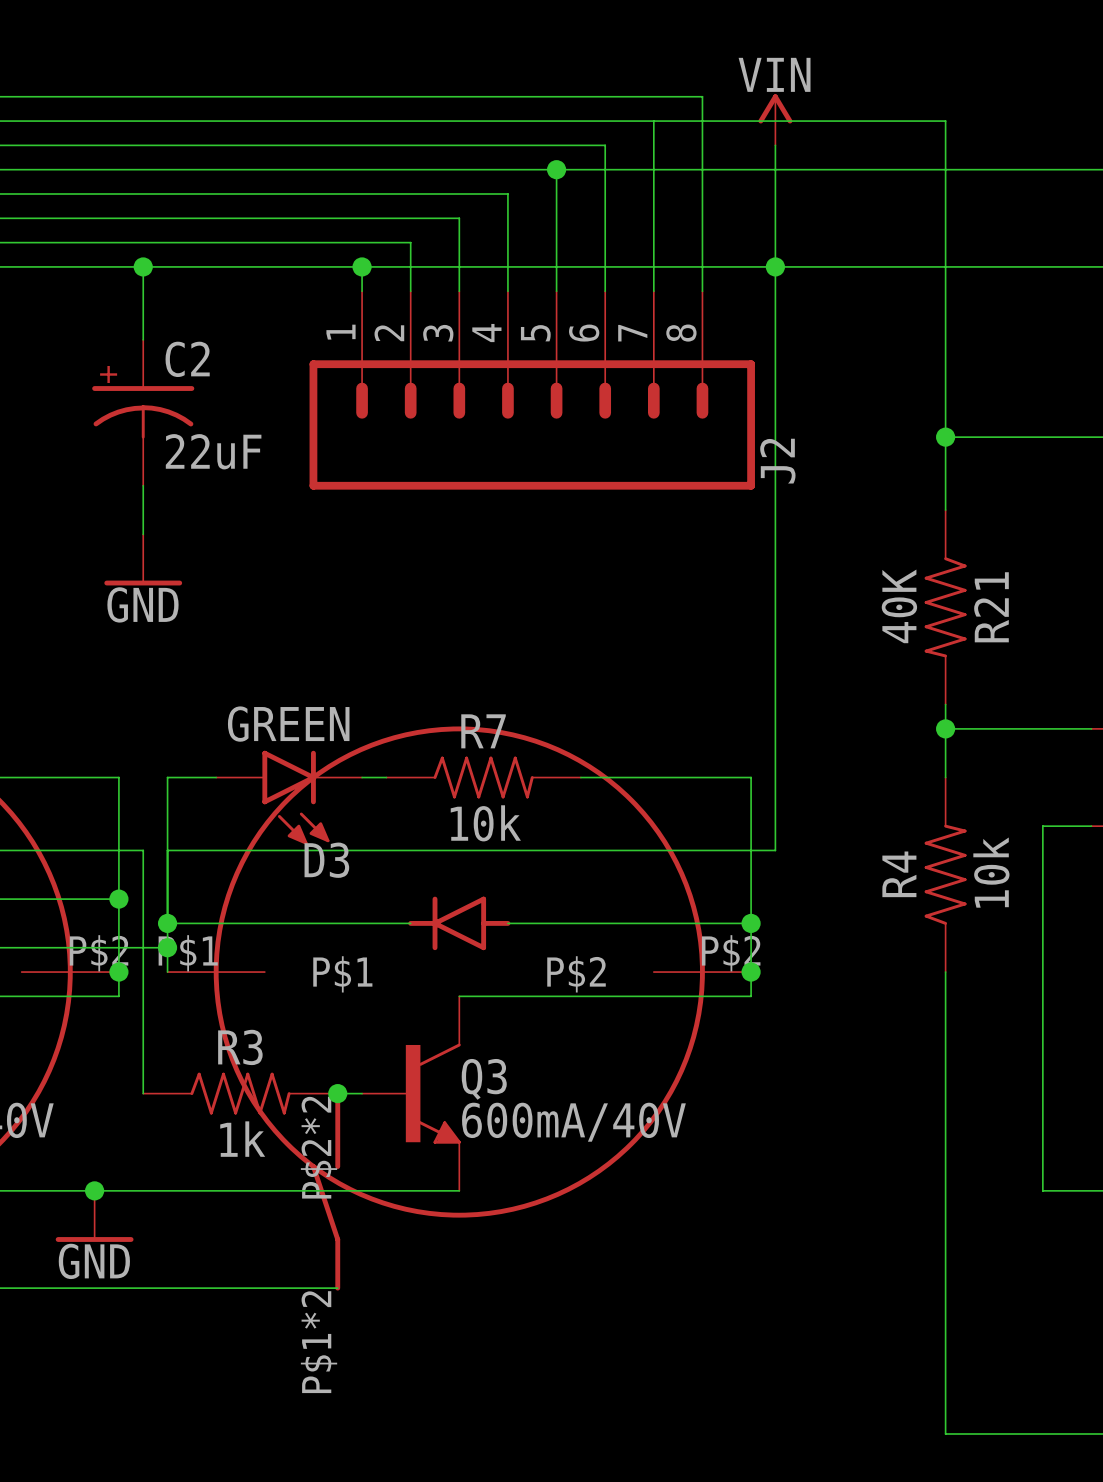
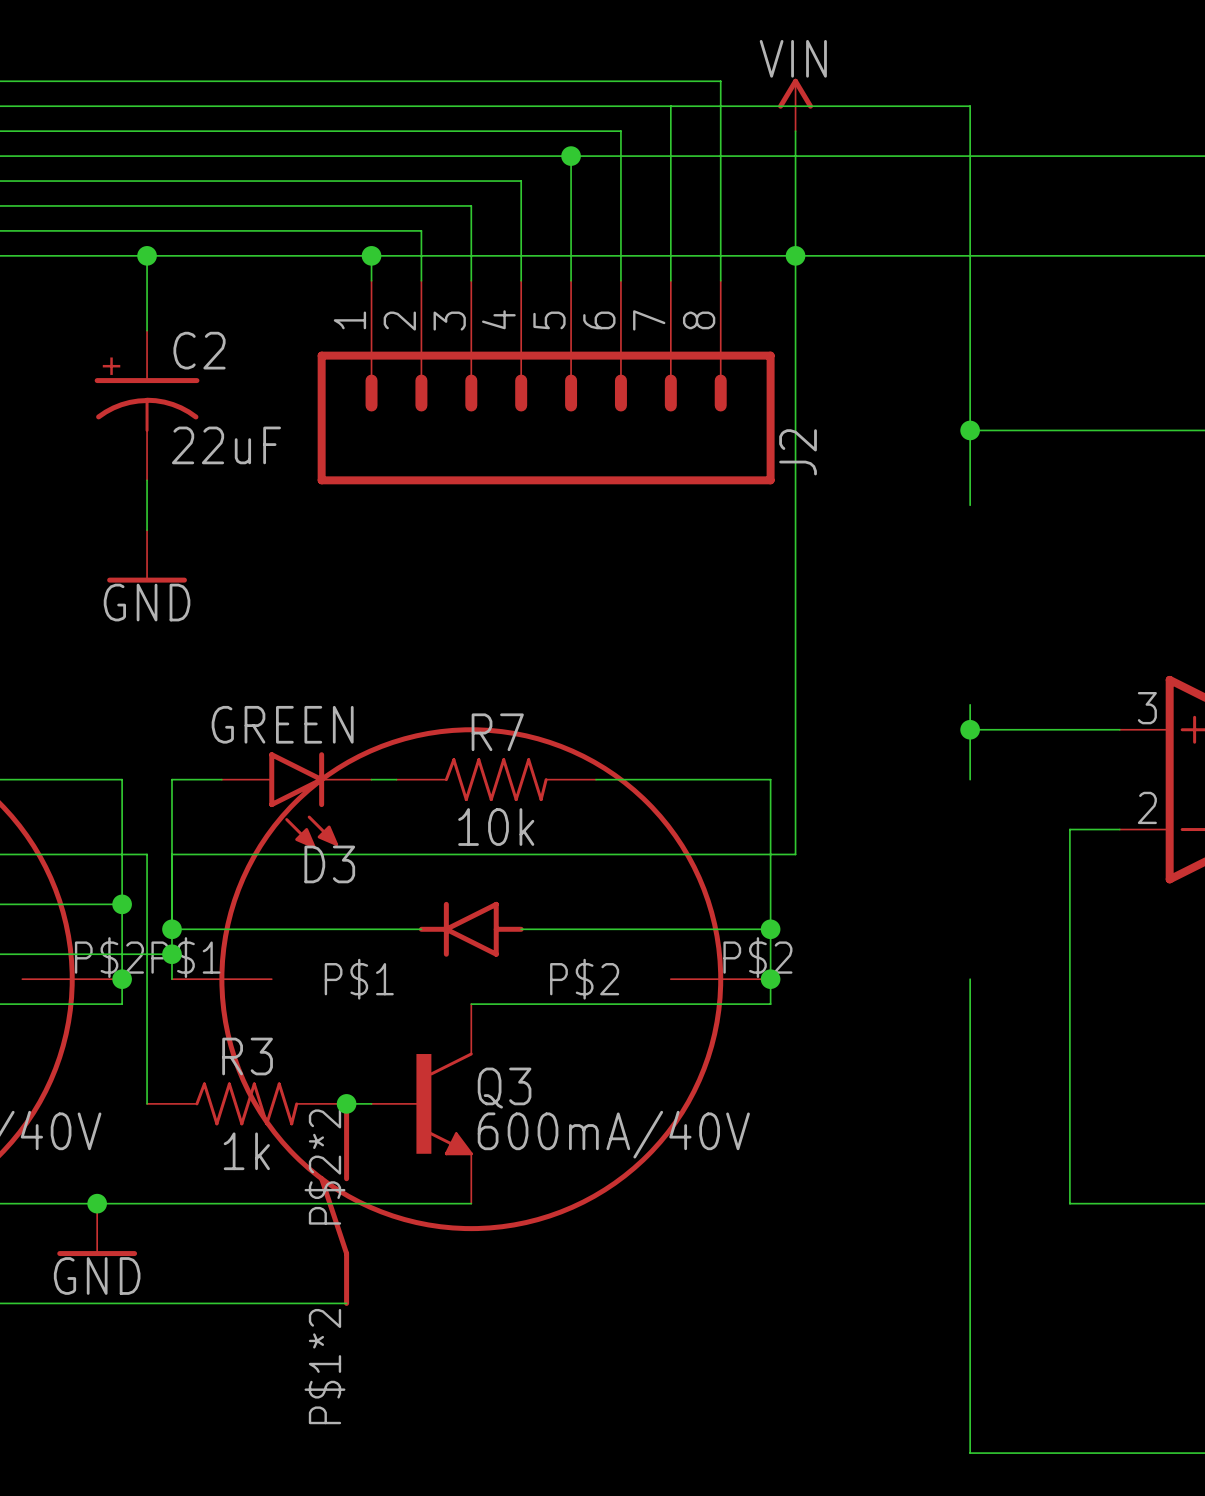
R21: 40K (945, 607) -> none
R4: 10k (945, 874) -> none

